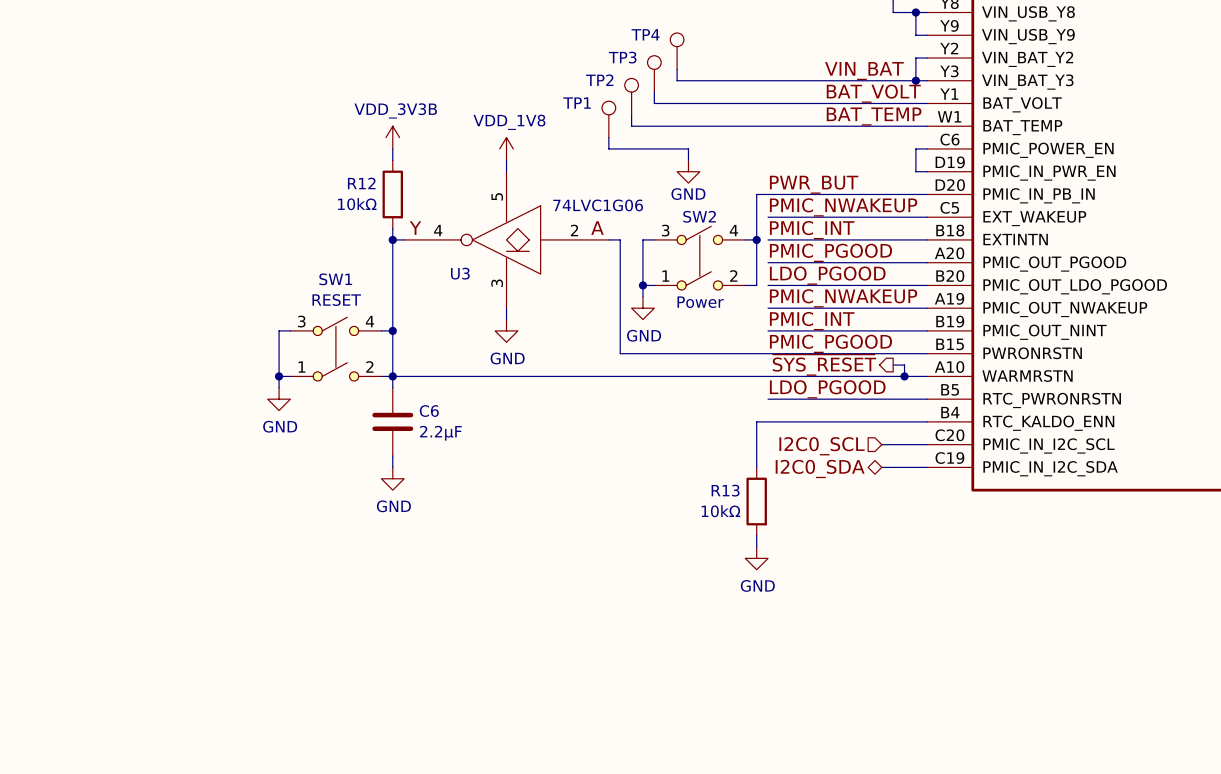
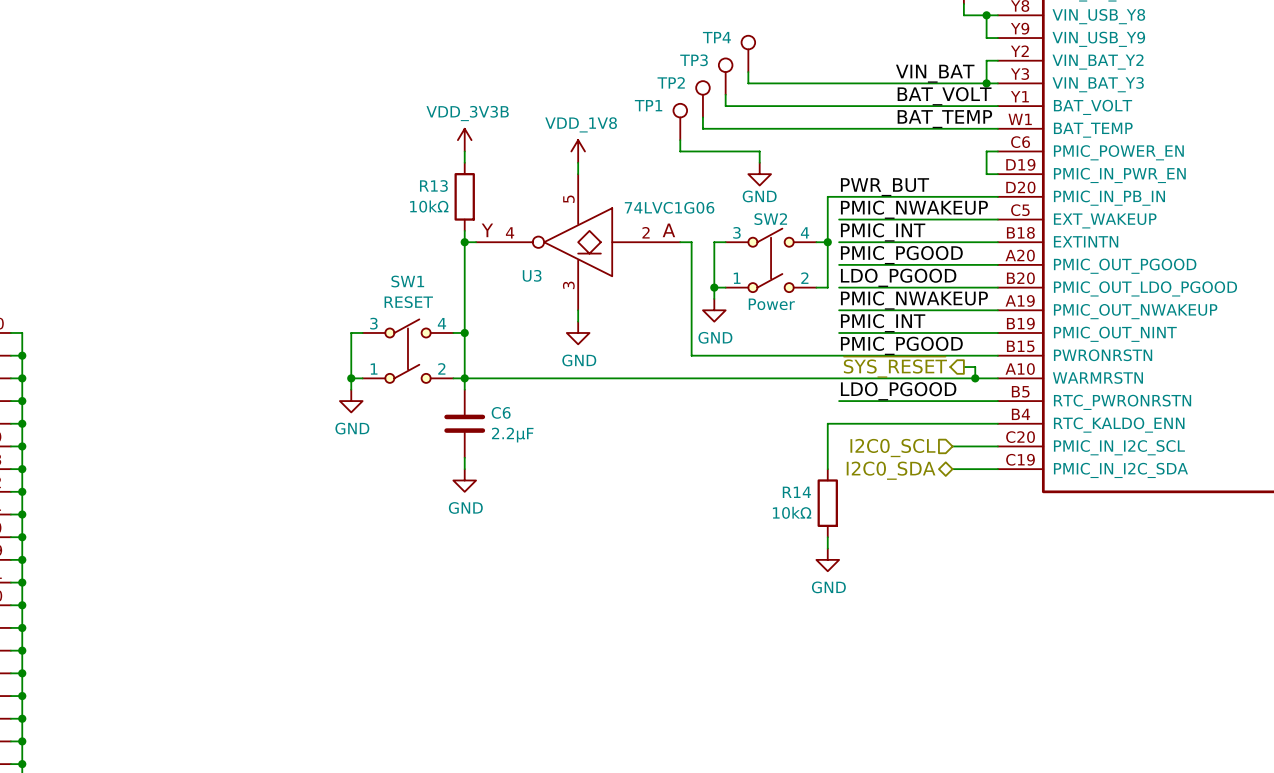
R12 name: R12 (361, 183) -> R13 (433, 185)
R13 name: R13 (725, 490) -> R14 (796, 492)

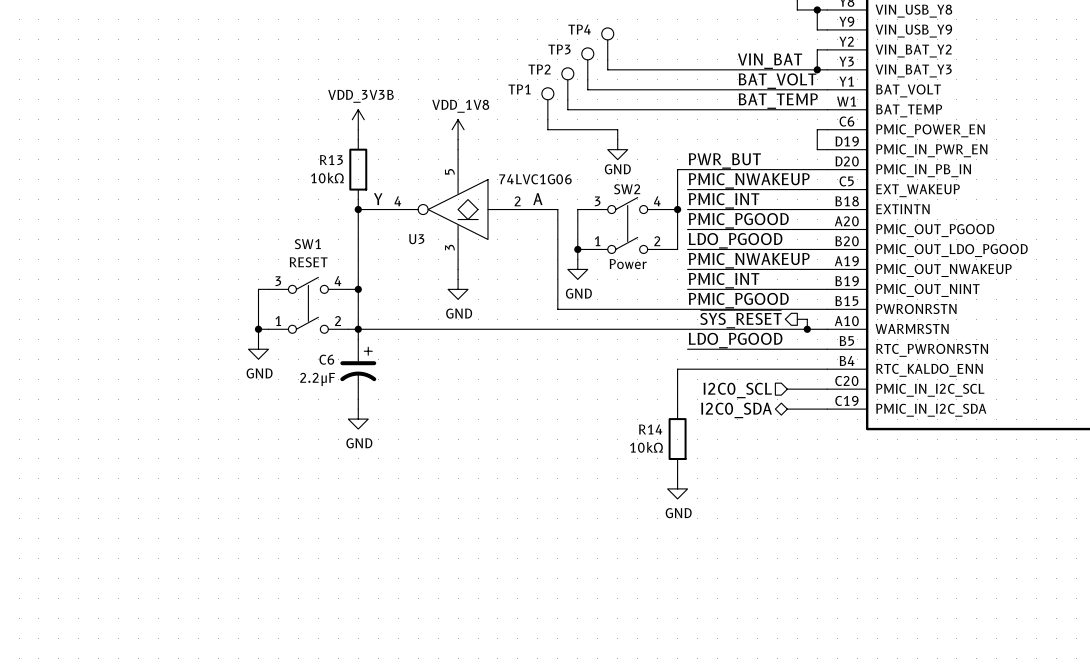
C6 symbol: [444, 389, 486, 458] -> [340, 339, 377, 400]
C6 name position: C6 (501, 412) -> C6 (326, 359)
C6 value position: 2.2μF (512, 435) -> 2.2μF (317, 379)

